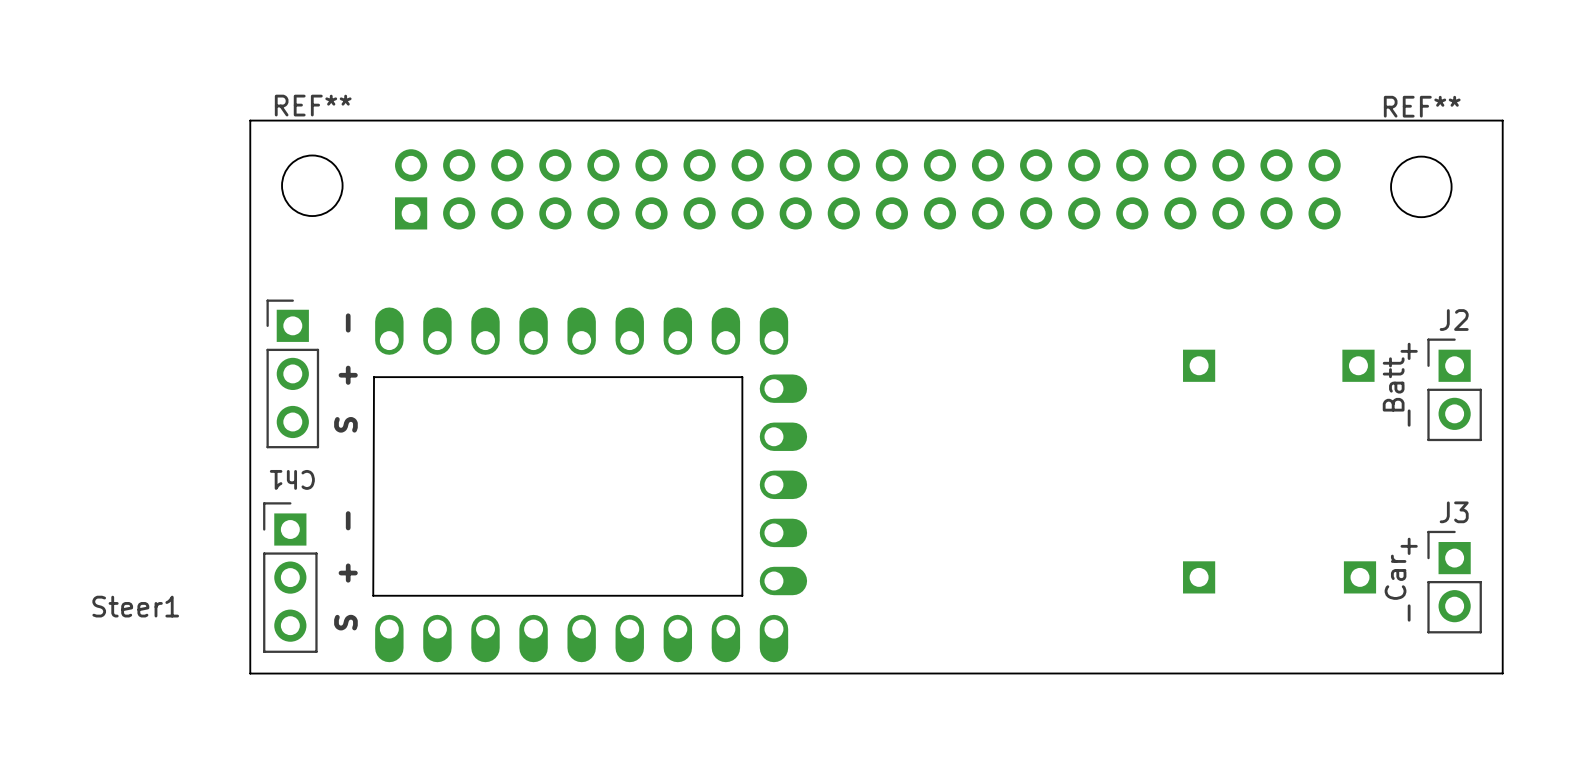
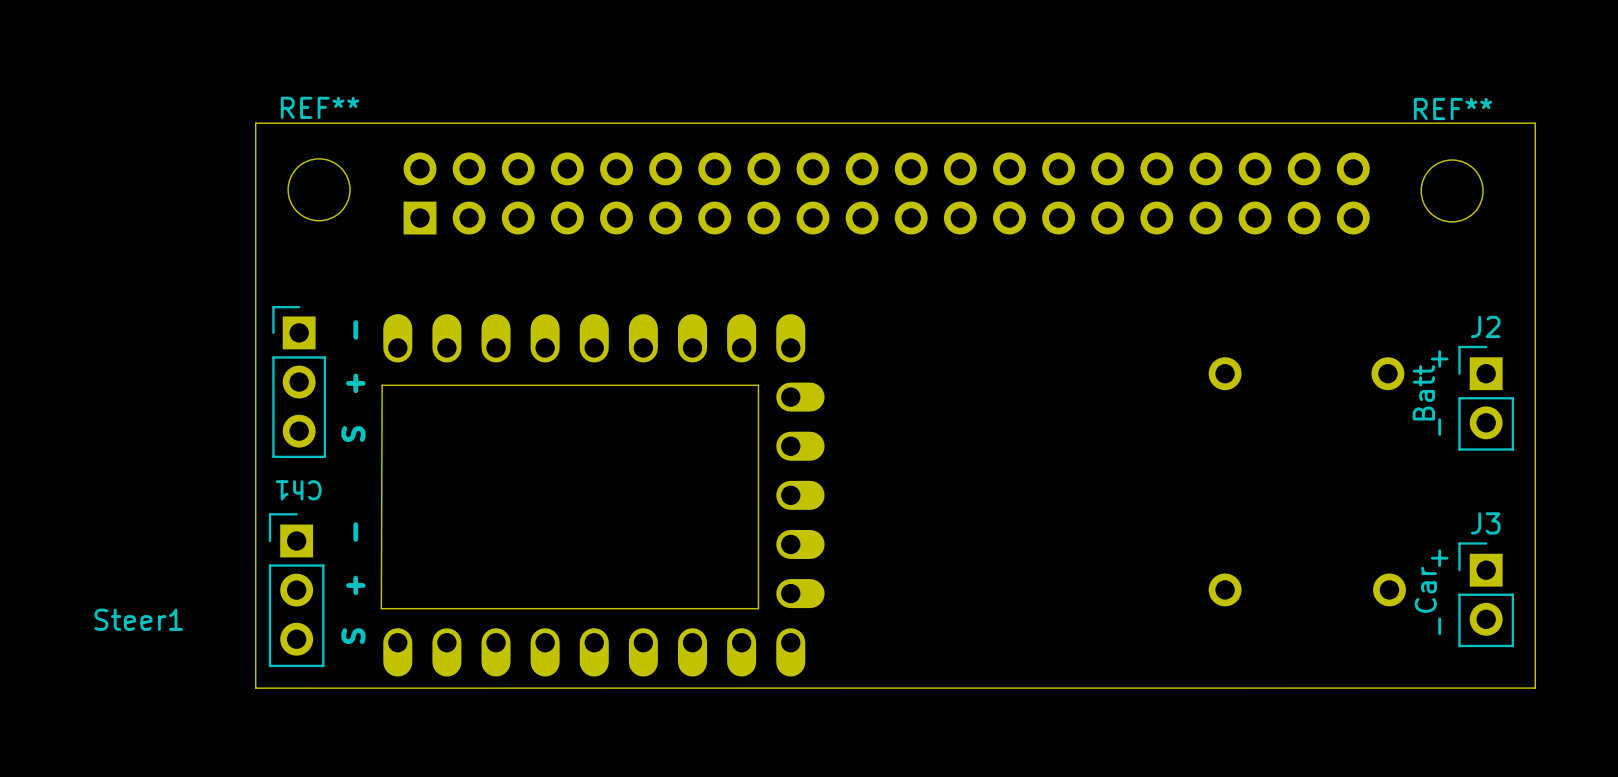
part footprint: [1183, 349, 1216, 382] -> [1208, 357, 1242, 391]
part footprint: [1342, 349, 1375, 382] -> [1371, 357, 1405, 391]
part footprint: [1183, 561, 1216, 594] -> [1208, 573, 1242, 607]
part footprint: [1343, 561, 1377, 594] -> [1373, 573, 1406, 607]

